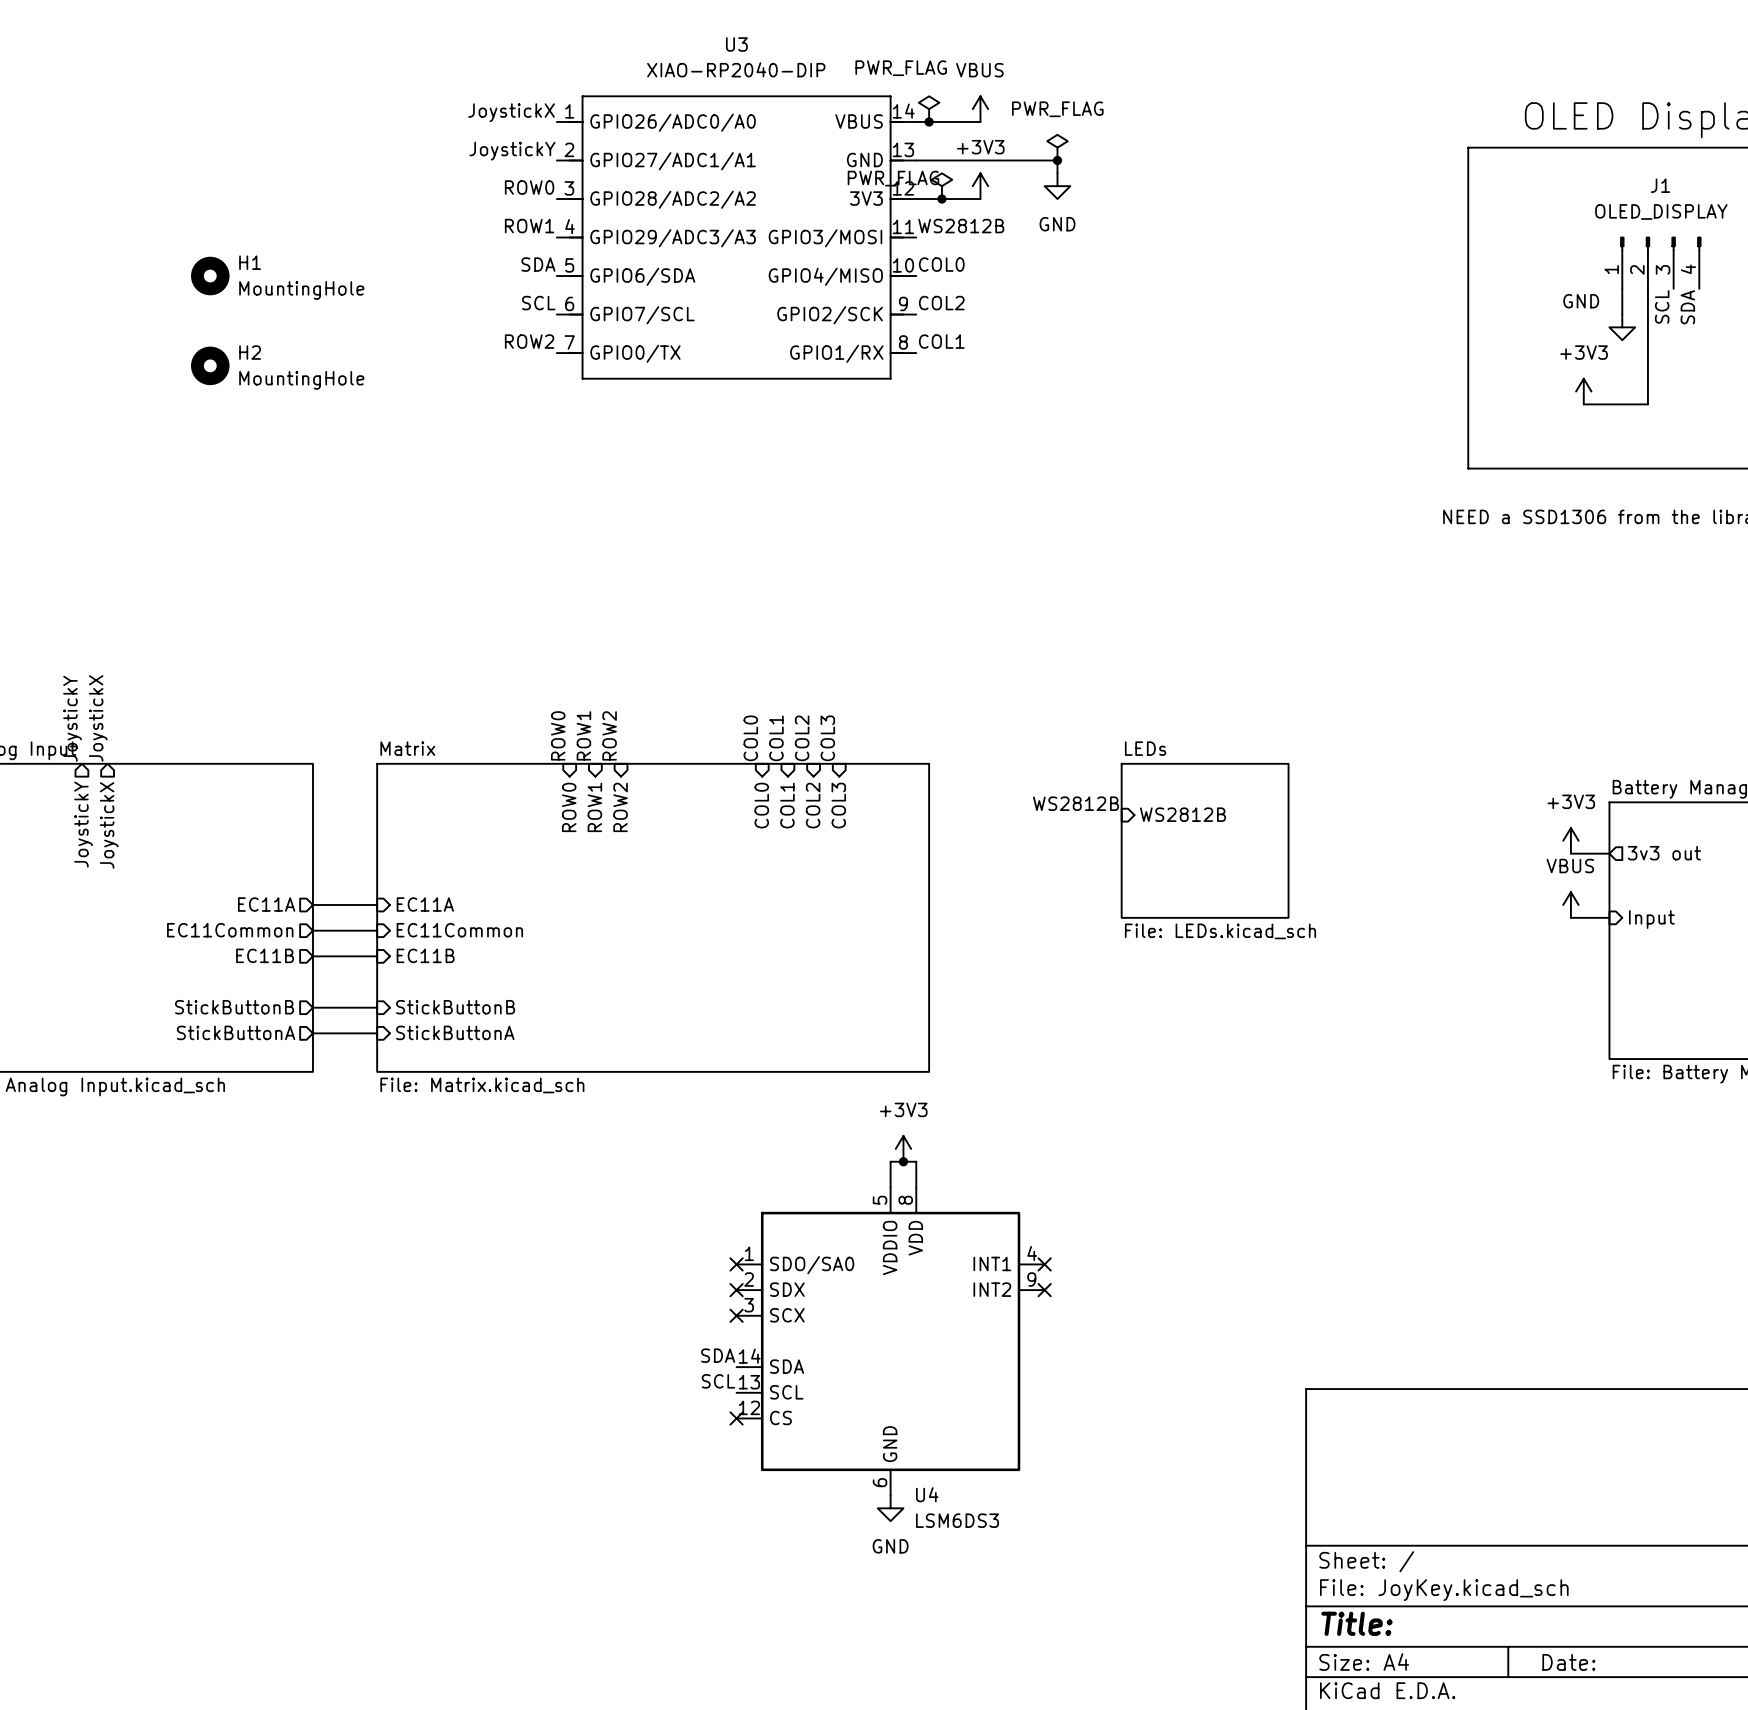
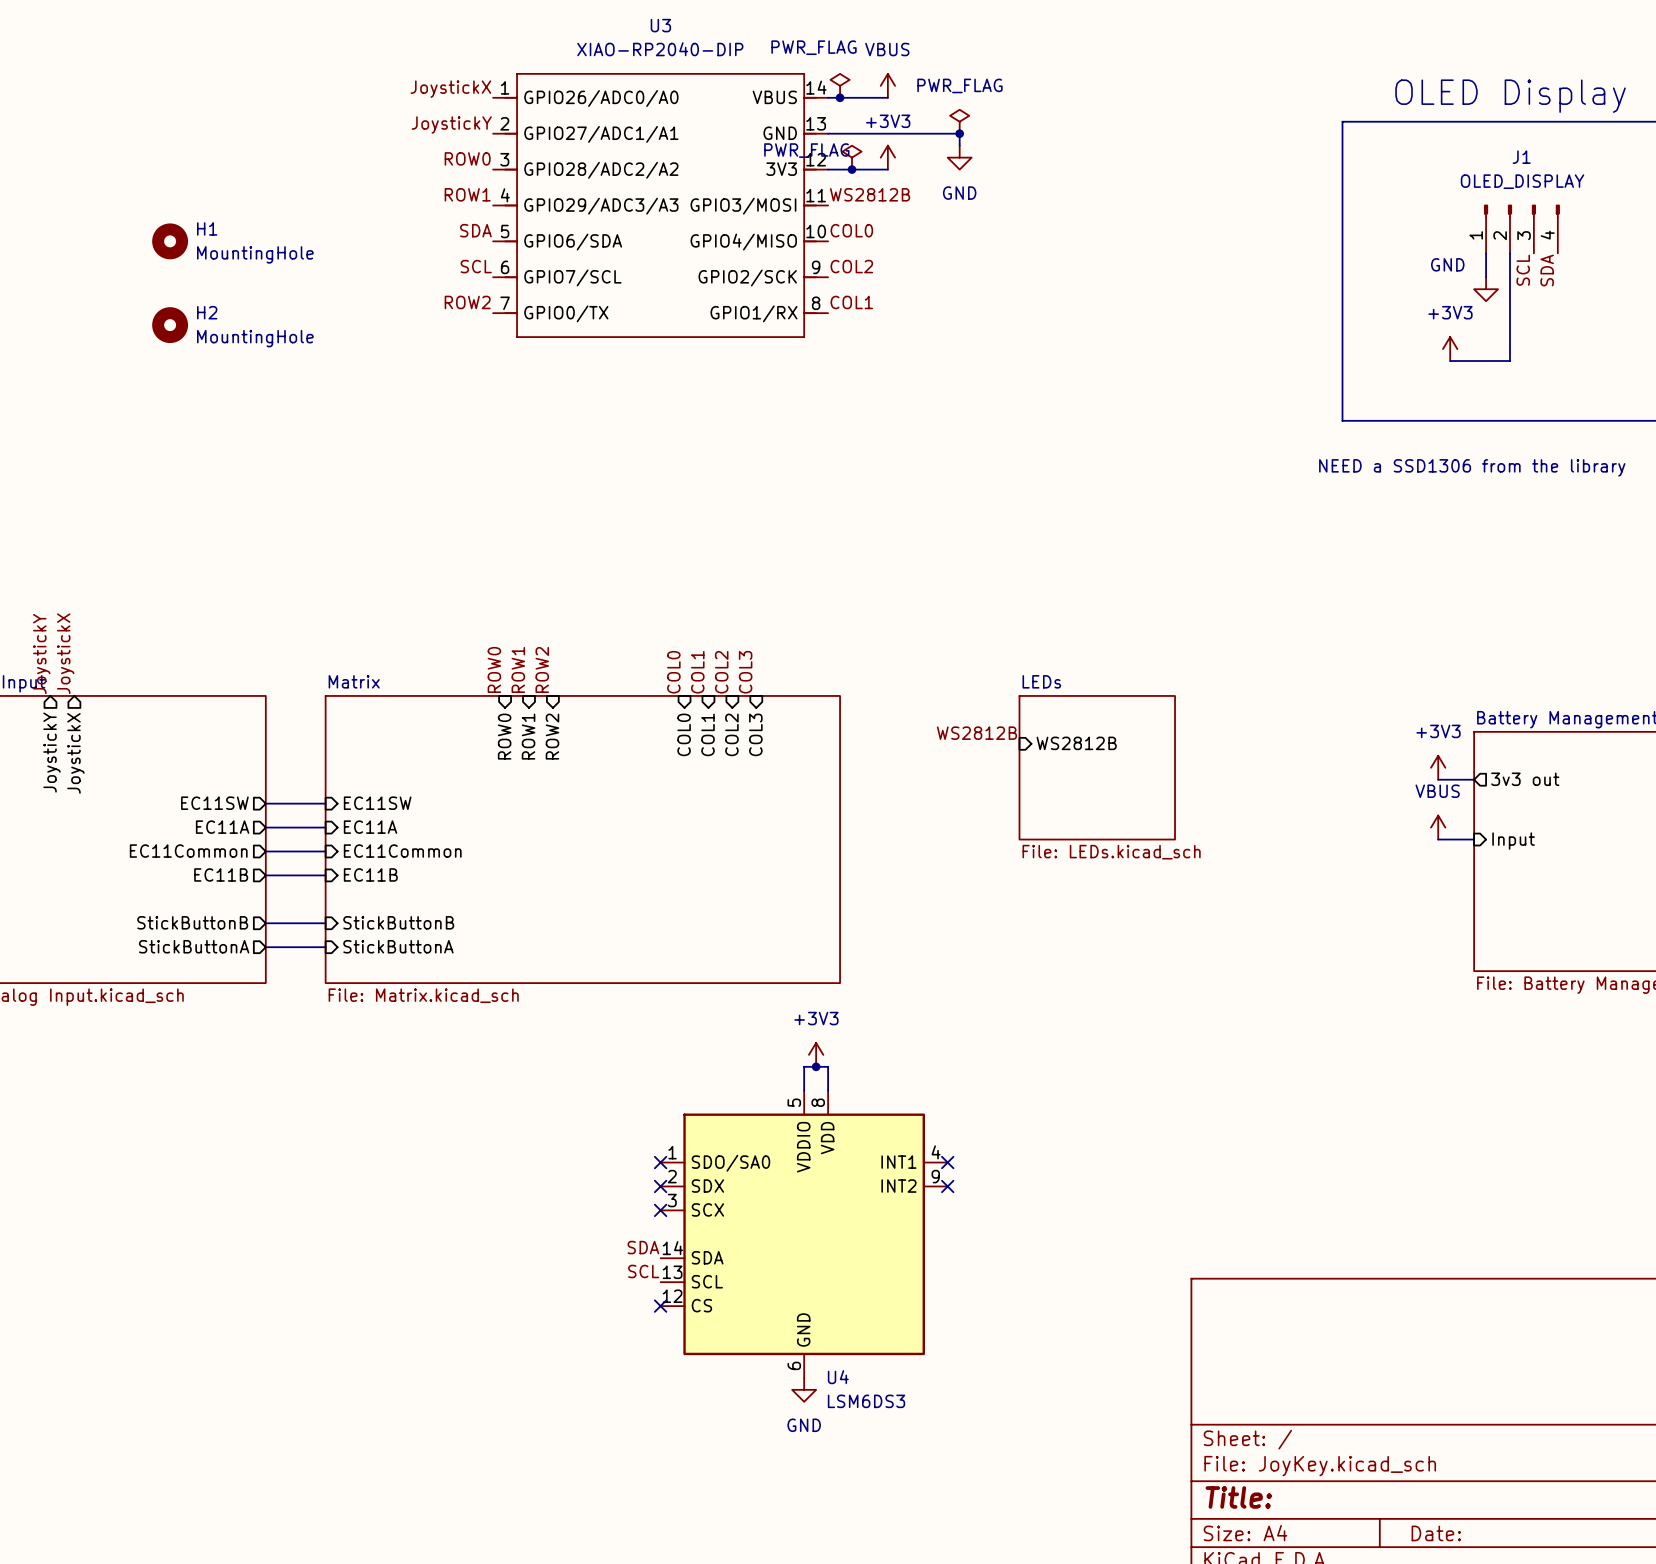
sheet pin: none -> EC11SW (214, 803)
sheet pin: none -> EC11SW (377, 803)
wire: none -> (265, 803) (325, 803)

